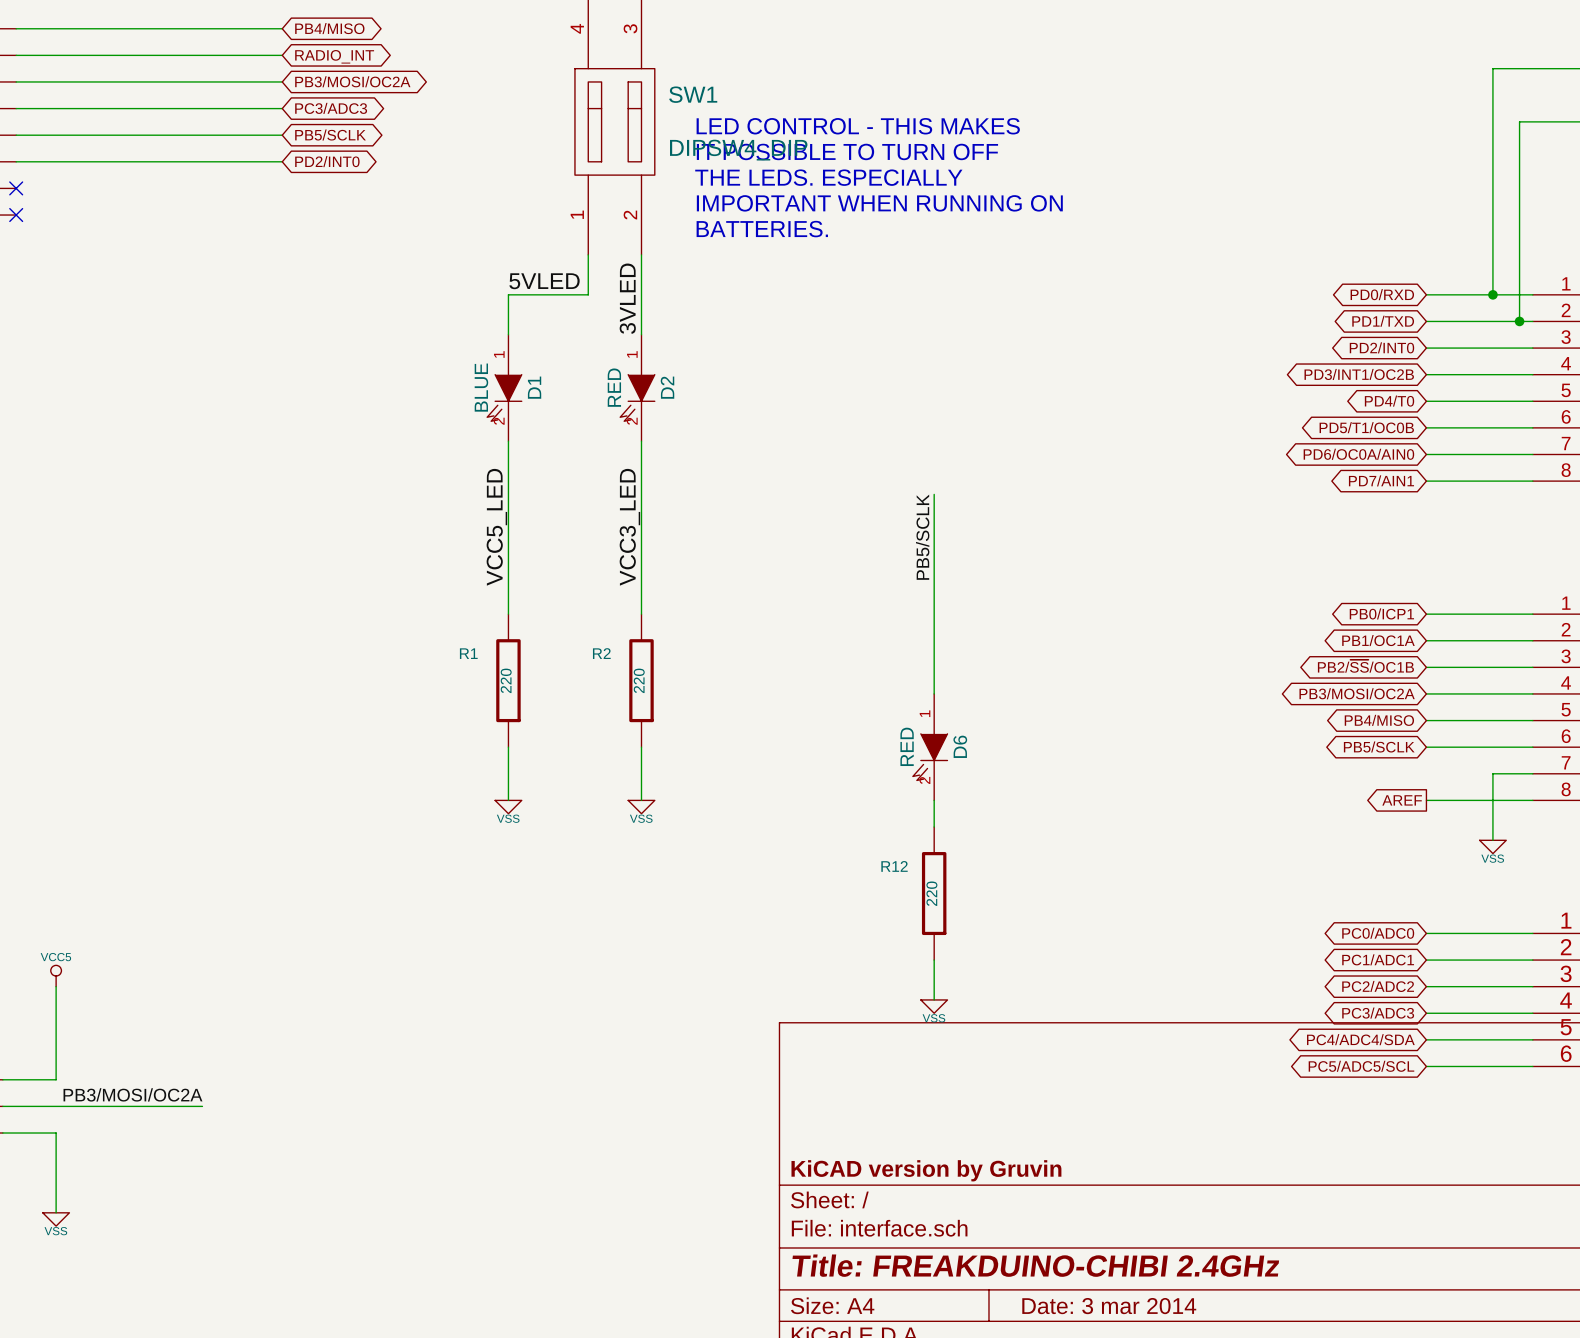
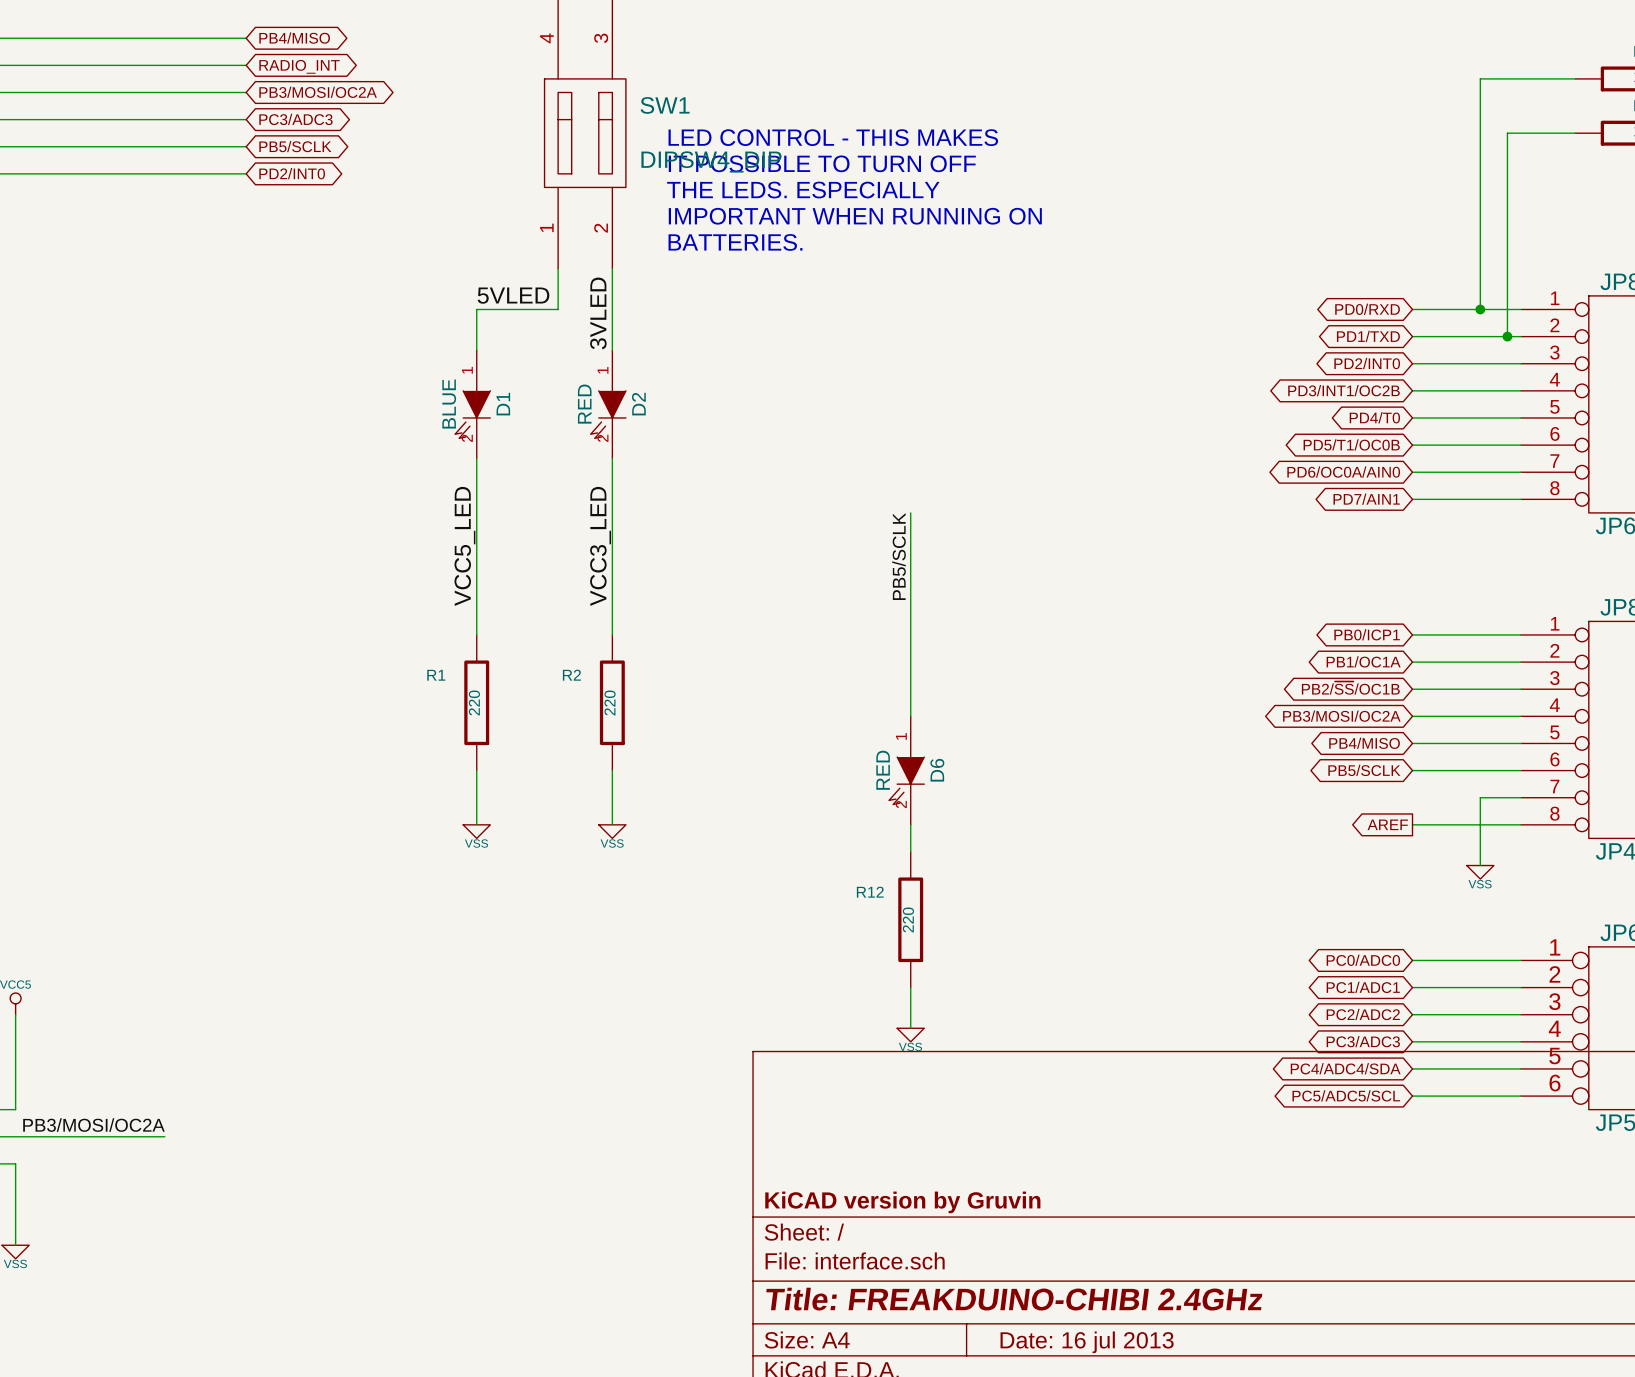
title block: Date: 3 mar 2014 (1109, 1306) -> Date: 16 jul 2013 (1087, 1342)

